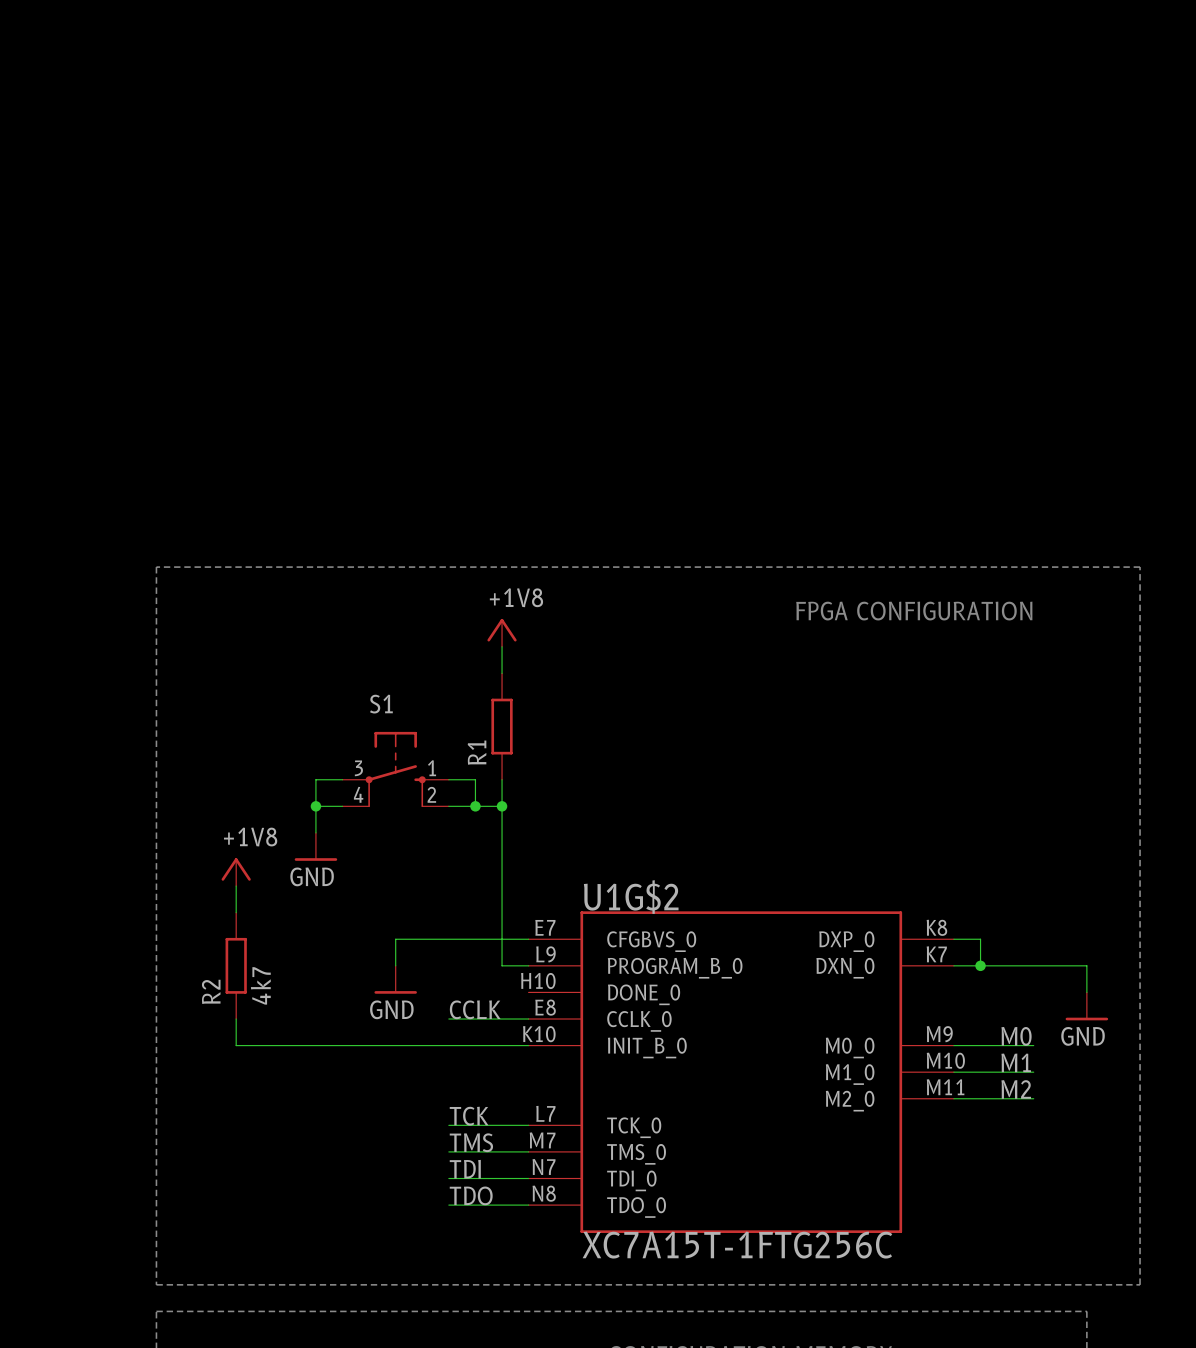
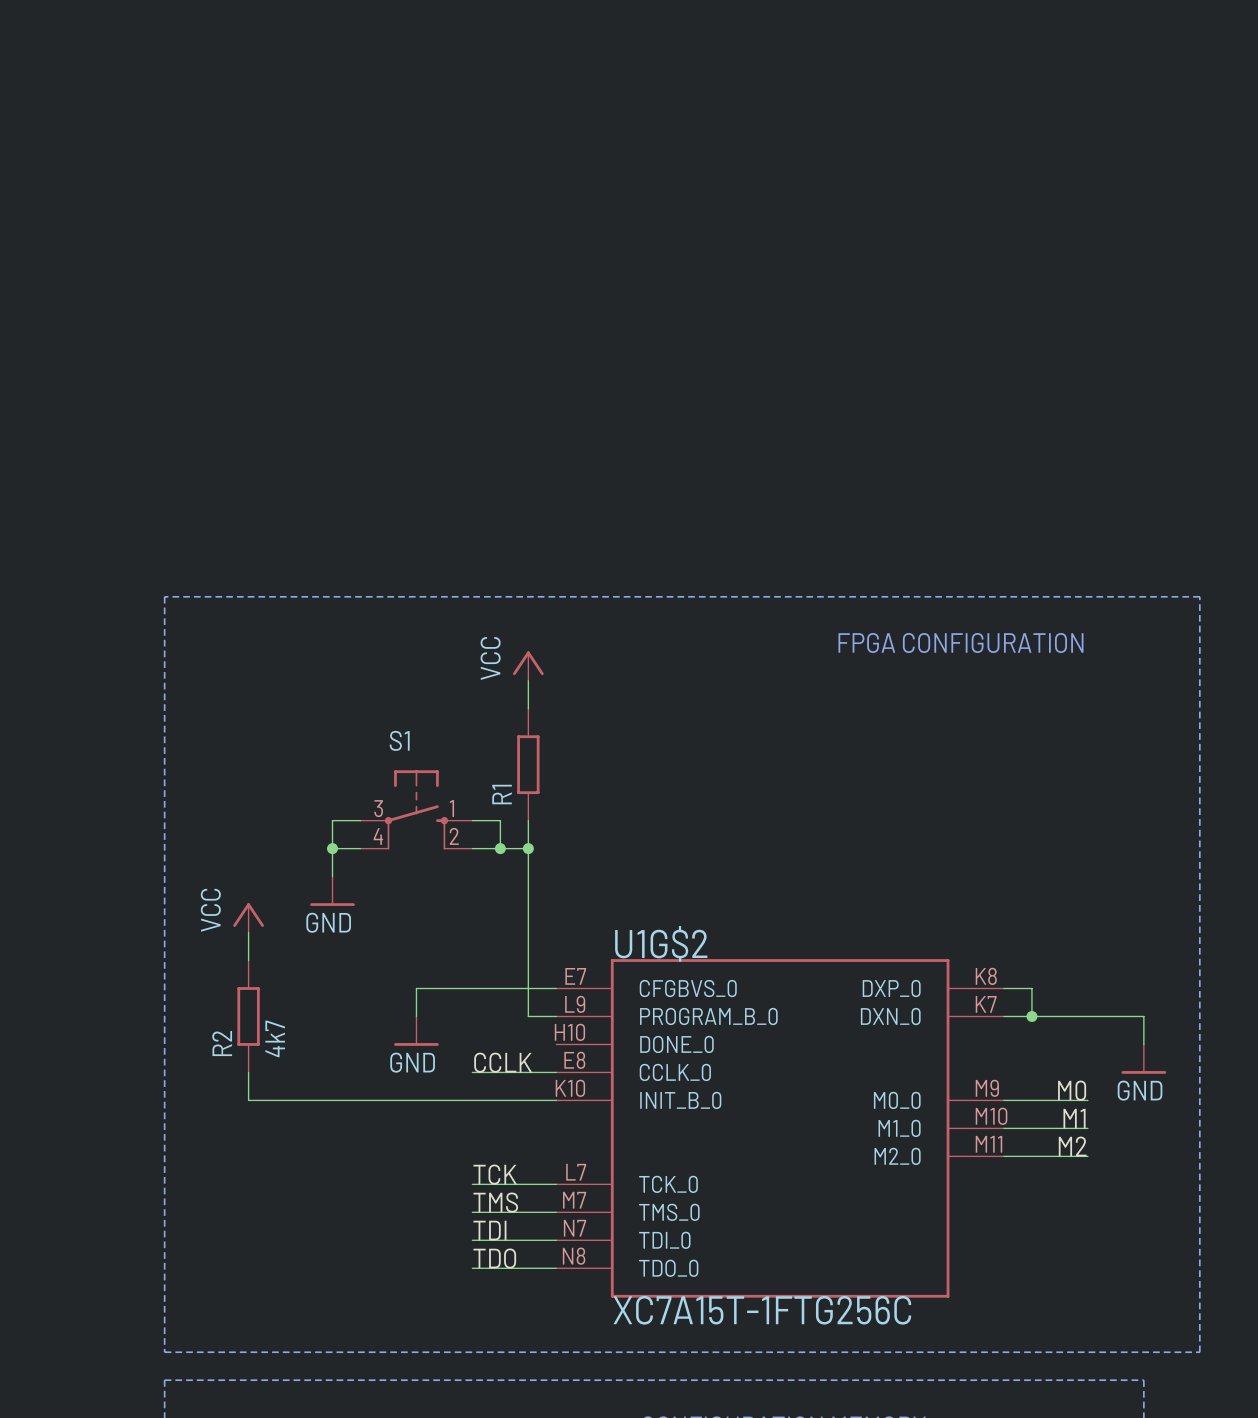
power symbol: +1V8 (502, 632) -> VCC (528, 666)
power symbol: +1V8 (236, 872) -> VCC (248, 917)

